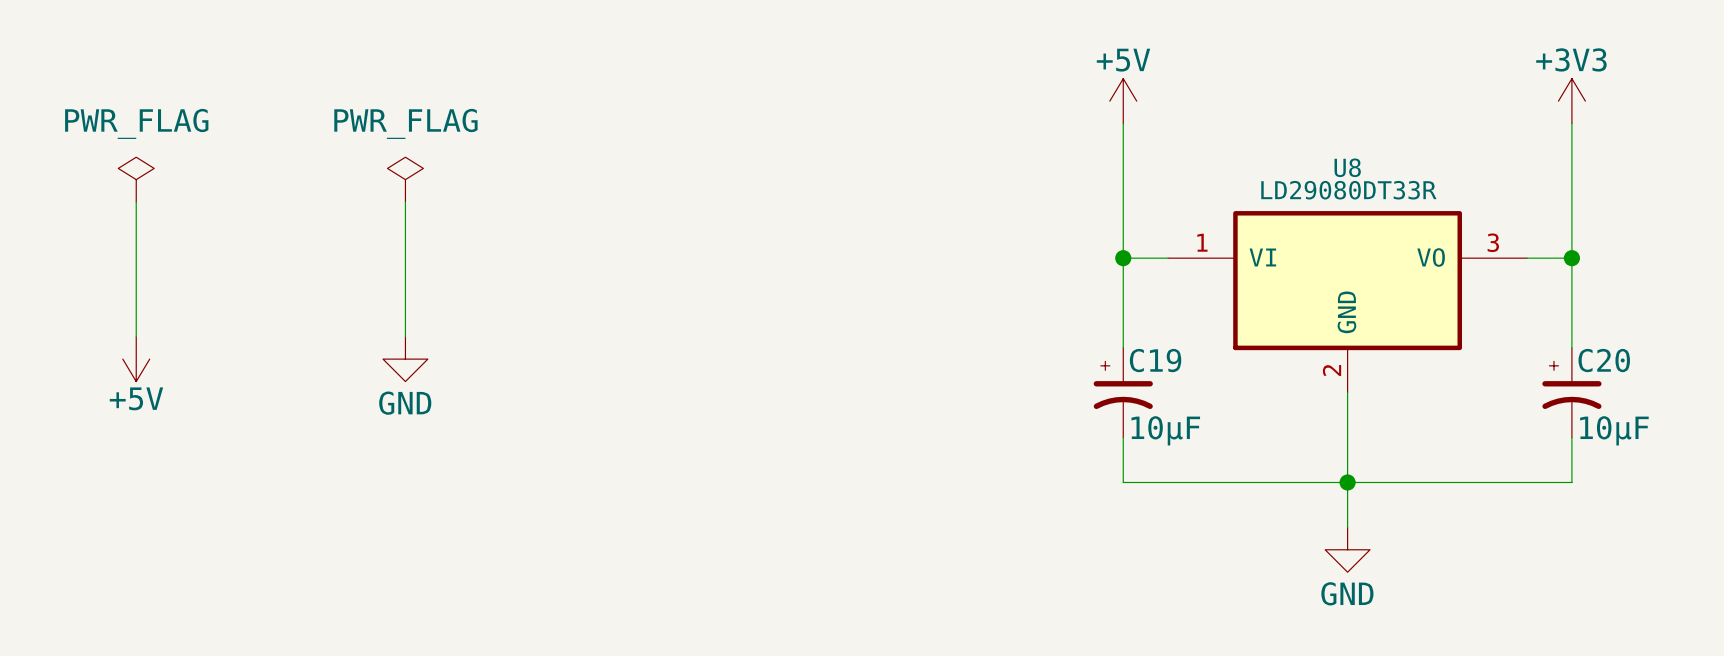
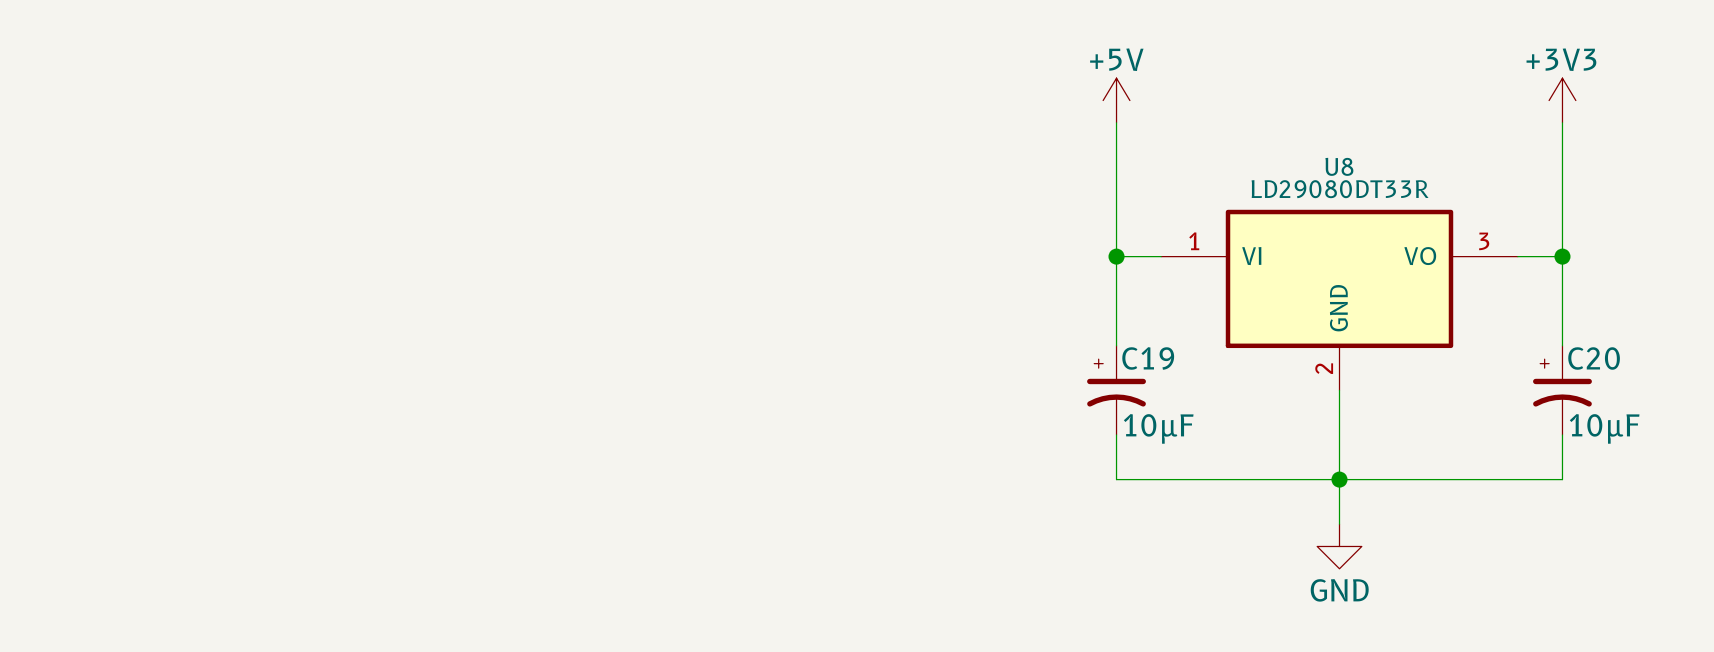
power symbol: PWR_FLAG (136, 179) -> none
power symbol: PWR_FLAG (405, 179) -> none
wire: (136, 202) (136, 336) -> none
wire: (405, 202) (405, 336) -> none
power symbol: +5V (136, 359) -> none
power symbol: GND (405, 359) -> none

